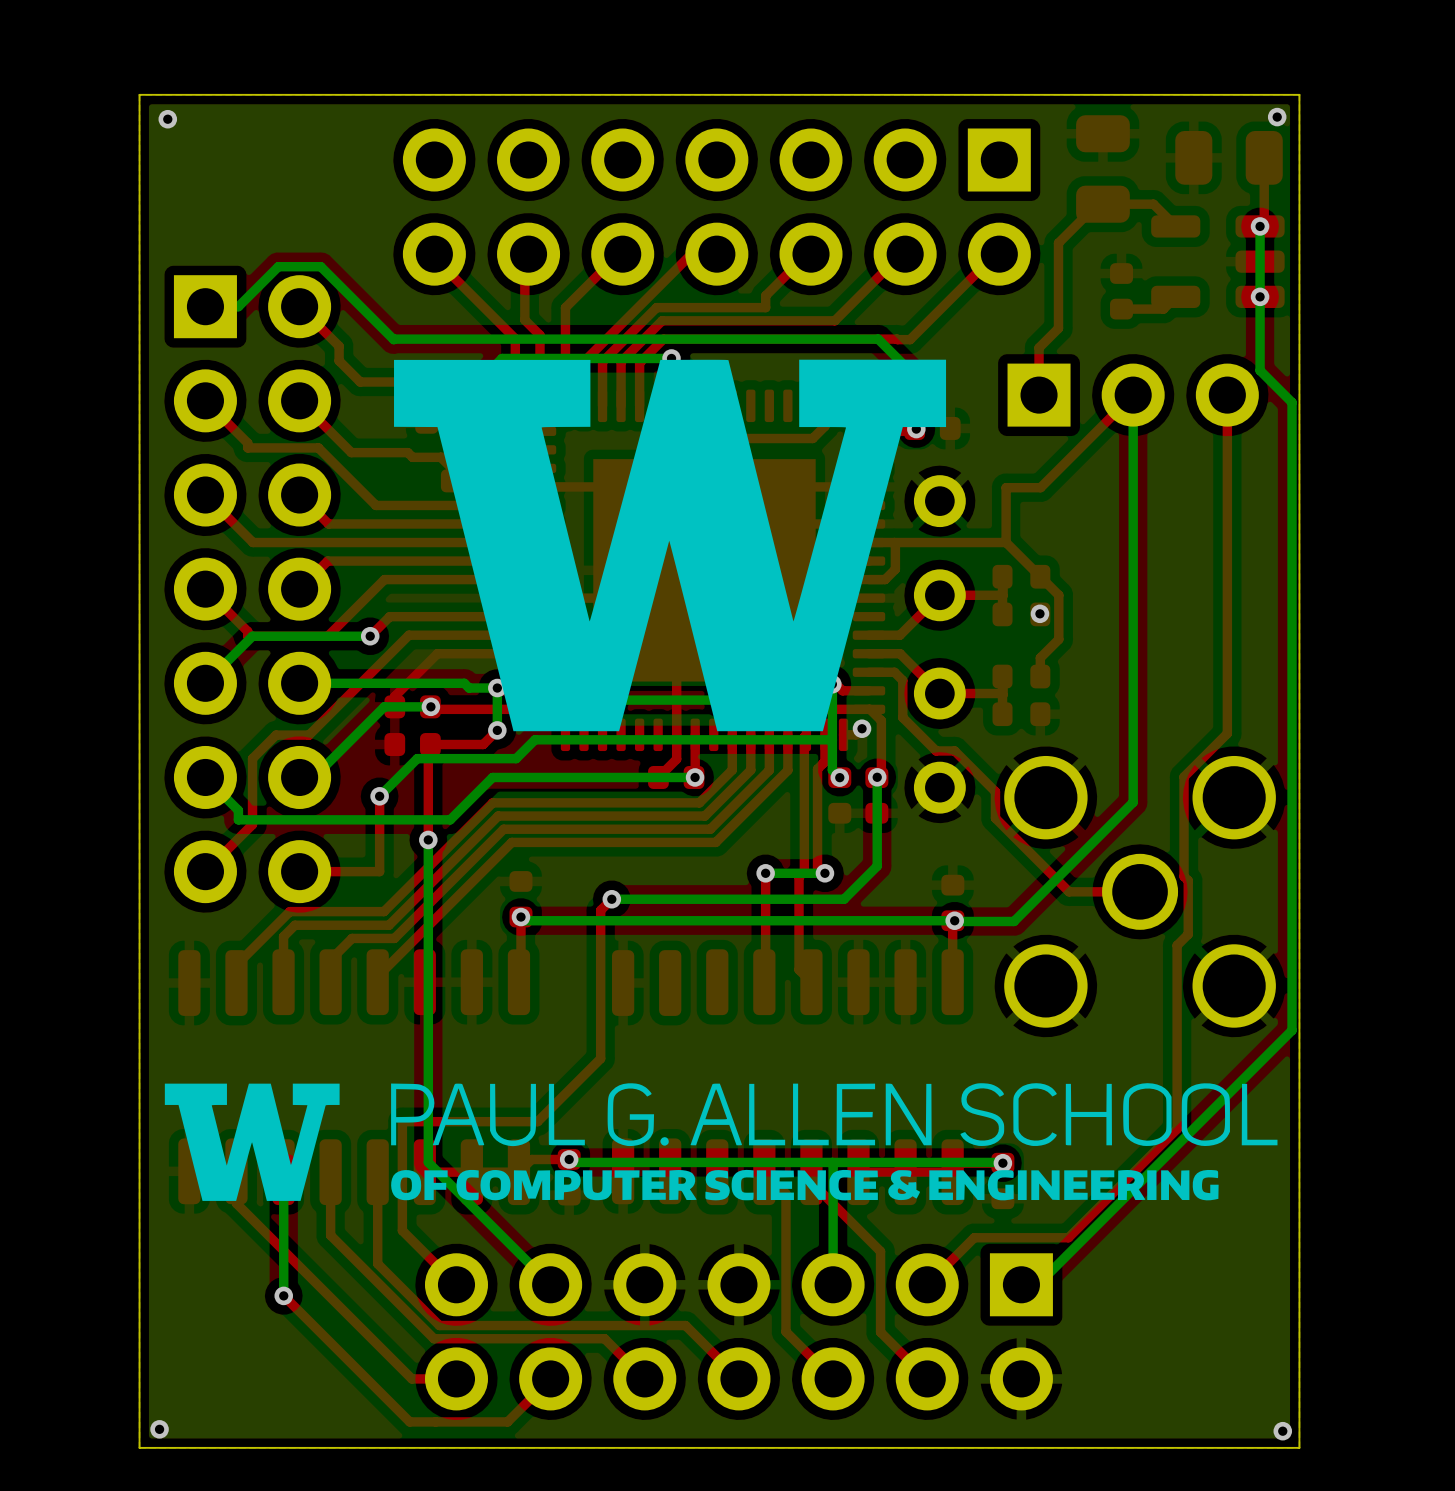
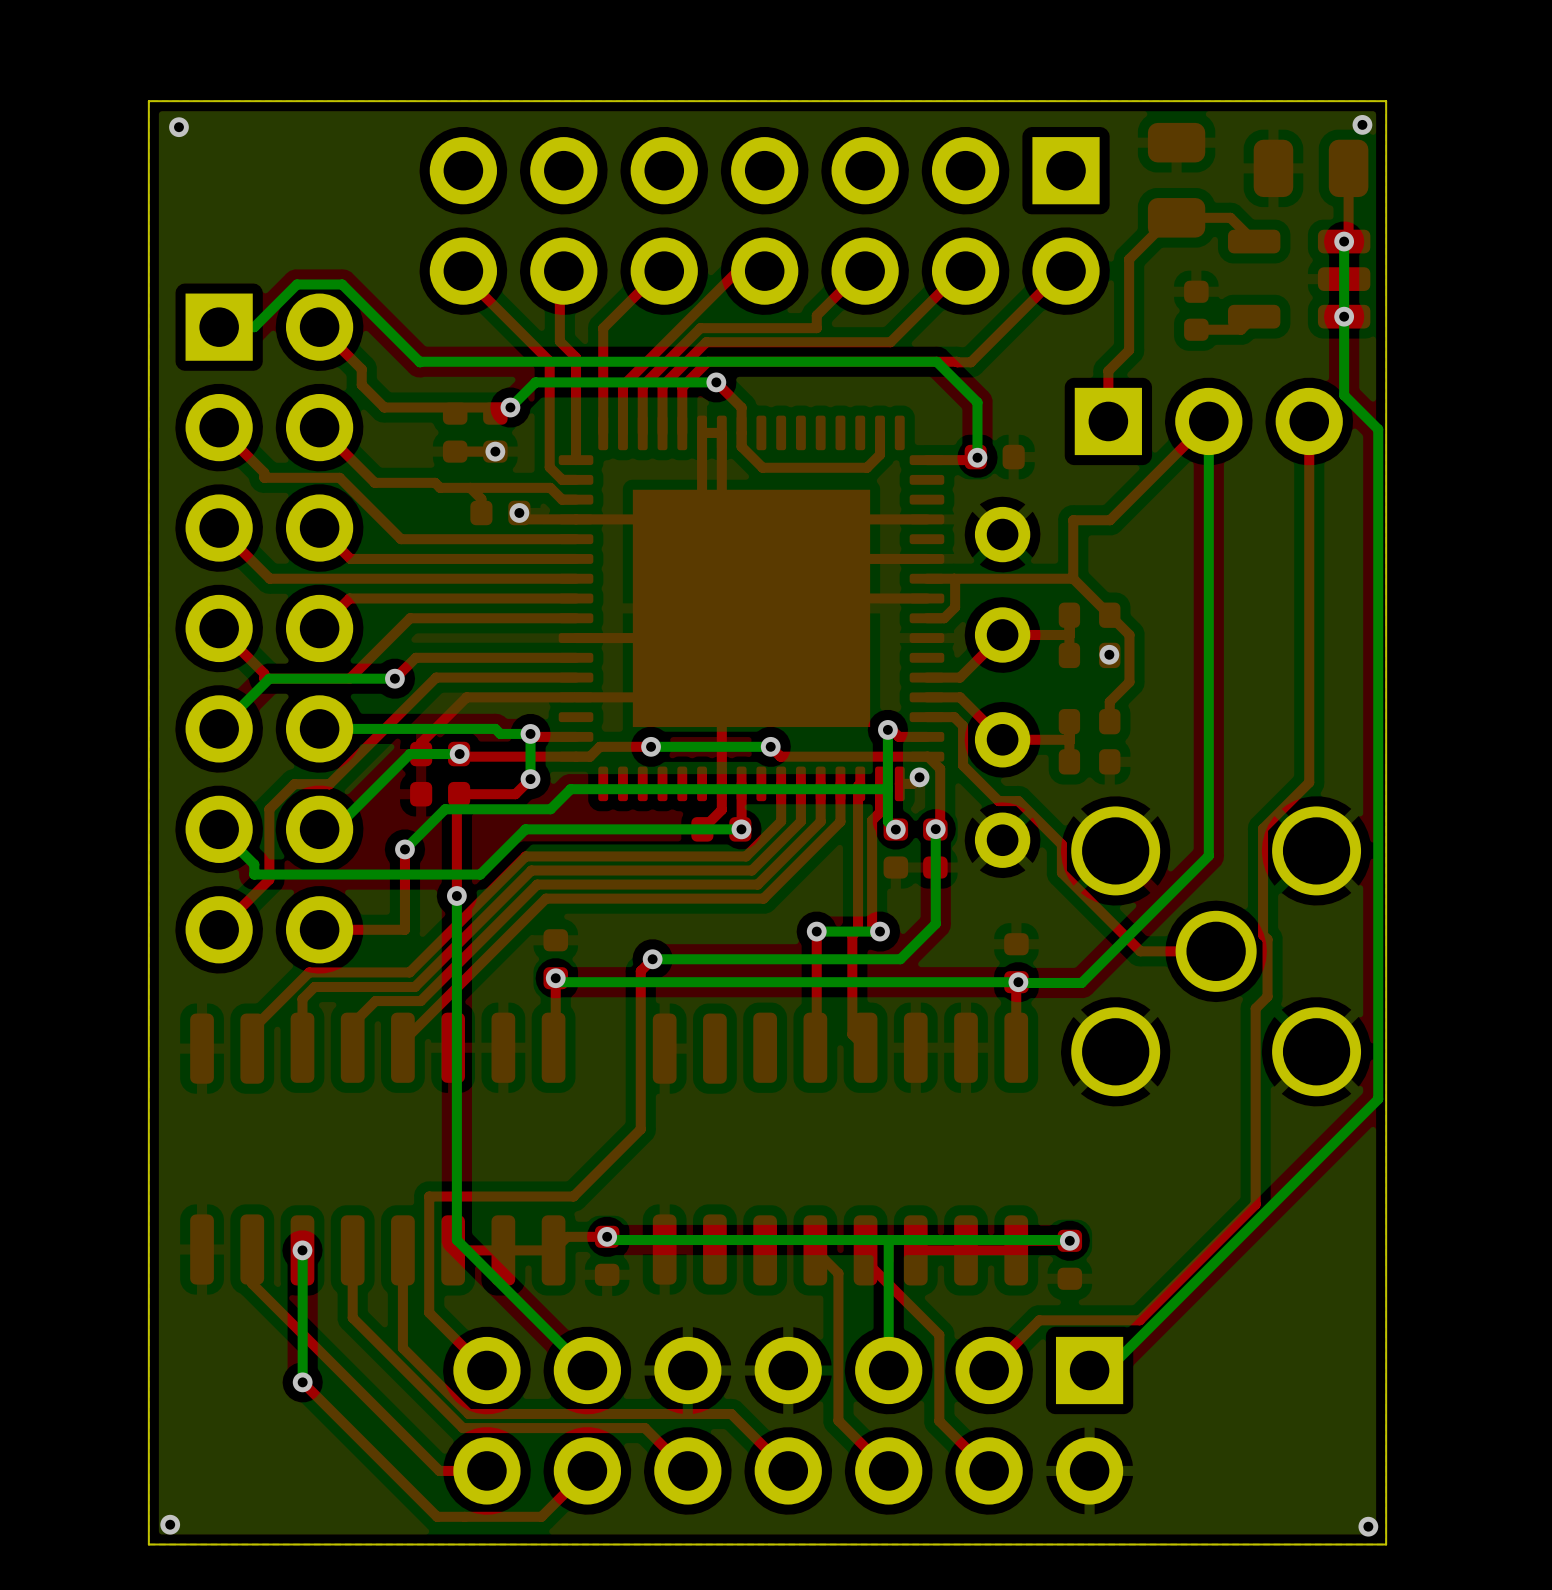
drawing: [394, 359, 947, 732] -> none
drawing: [164, 1083, 1278, 1201] -> none

